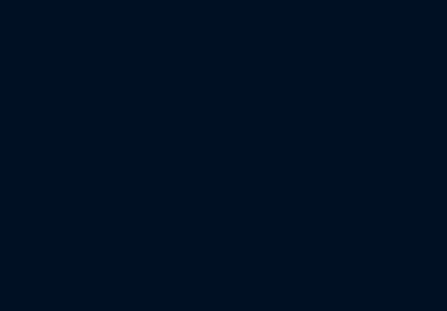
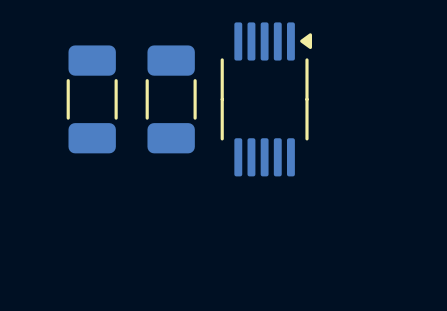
part: none -> (92, 99)
part: none -> (171, 99)
part: none -> (266, 99)

